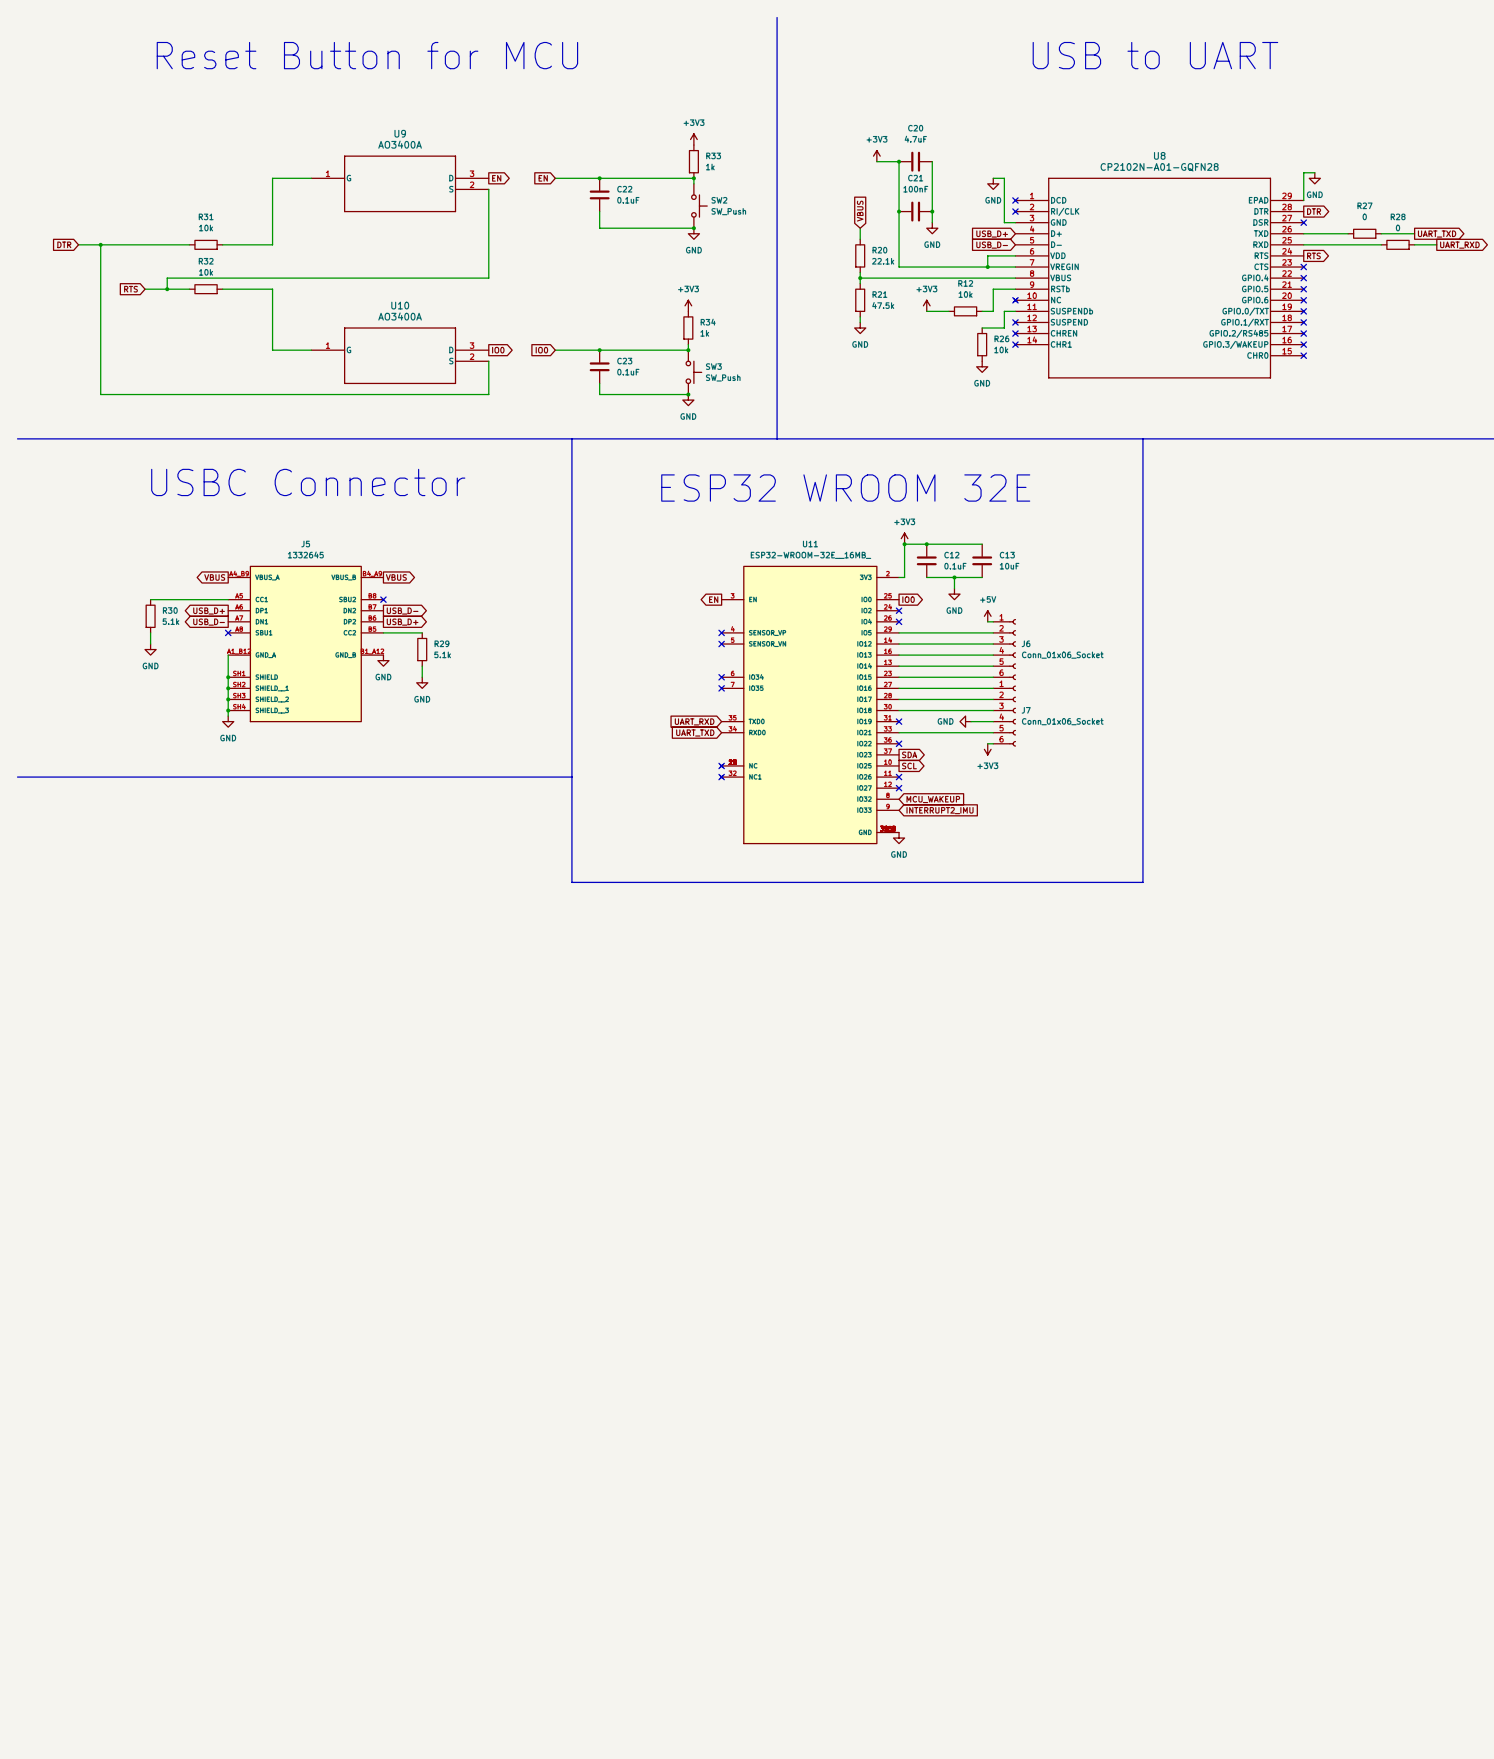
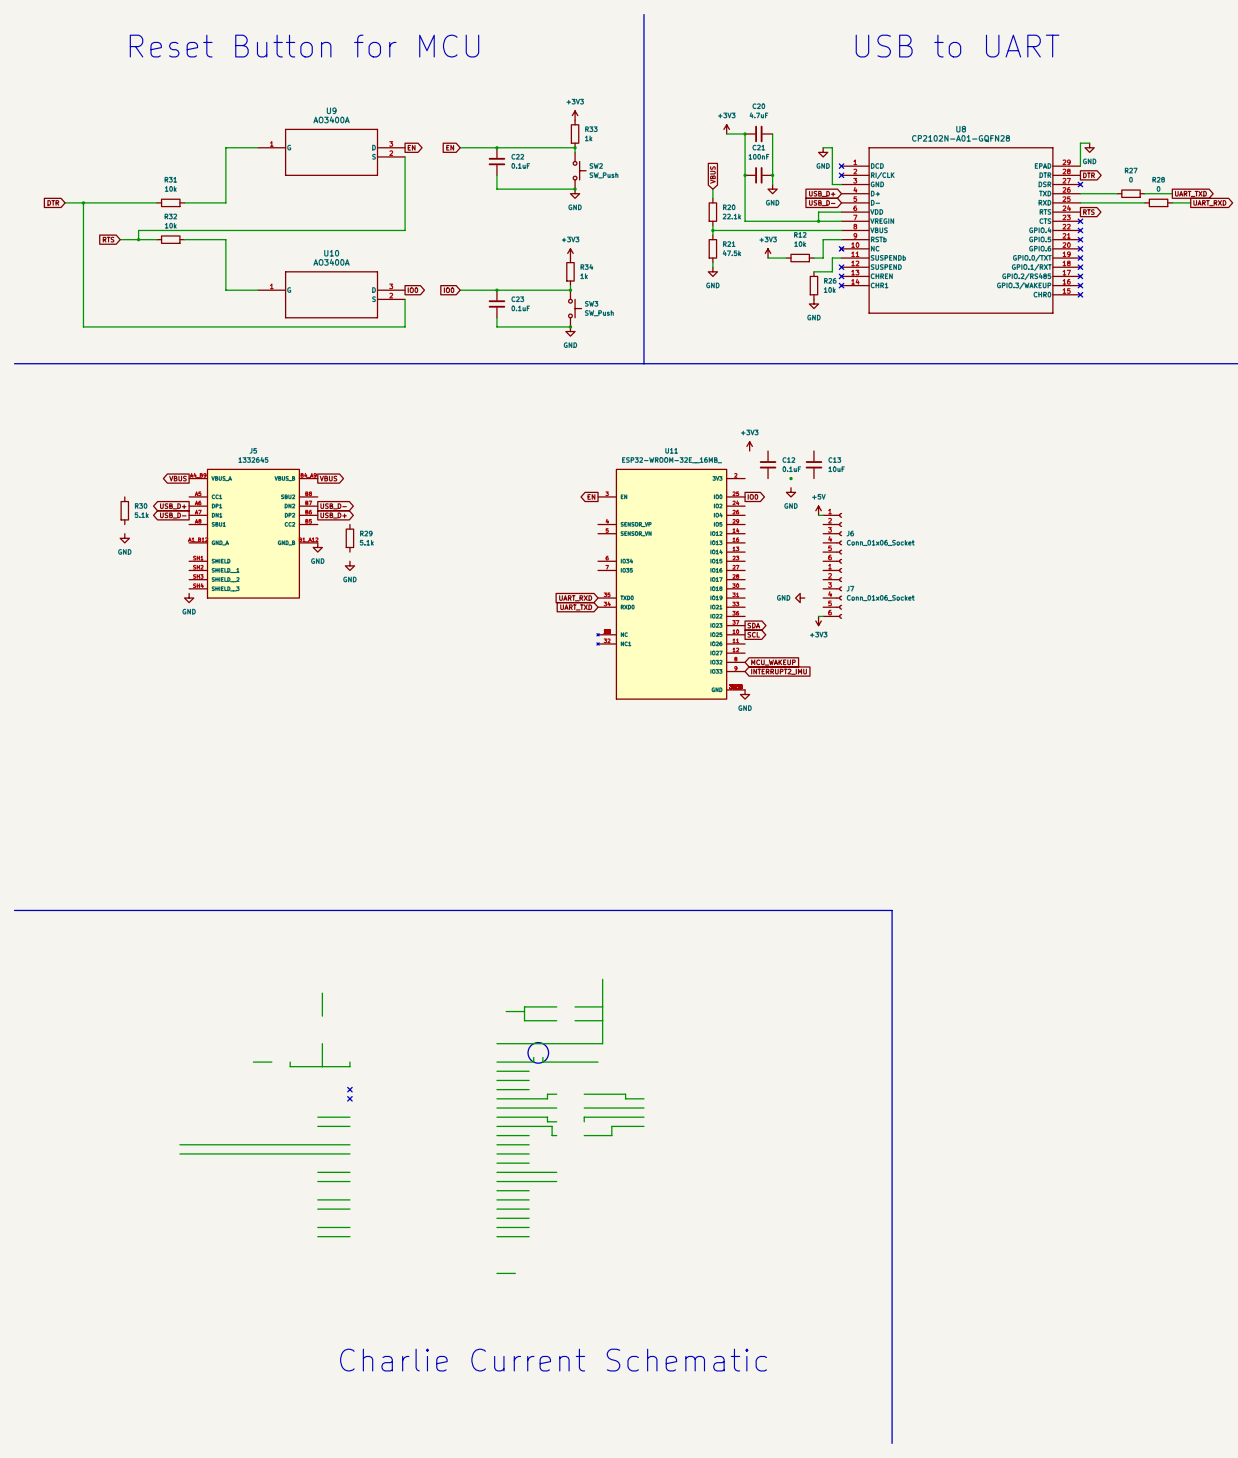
line: (571, 438) (571, 882) (1142, 882) (1142, 438) -> none
text: USBC Connector (308, 482) -> none
text: ESP32 WROOM 32E (845, 488) -> none
junction: (904, 544) -> none
junction: (926, 544) -> none
wire: (982, 544) (904, 544) (904, 577) (899, 577) -> none
wire: (926, 577) (982, 577) -> none
wire: (954, 577) (954, 588) -> none
wire: (150, 599) (228, 599) -> none
no-connect mark: (383, 599) -> none
no-connect mark: (899, 610) -> none
no-connect mark: (899, 621) -> none
wire: (150, 632) (150, 644) -> none
no-connect mark: (228, 632) -> none
wire: (383, 632) (422, 632) -> none
no-connect mark: (721, 632) -> none
wire: (899, 632) (993, 632) -> none
no-connect mark: (721, 644) -> none
wire: (899, 644) (993, 644) -> none
wire: (228, 655) (228, 716) -> none
wire: (899, 655) (993, 655) -> none
wire: (422, 666) (422, 677) -> none
wire: (899, 666) (993, 666) -> none
junction: (228, 677) -> none
no-connect mark: (721, 677) -> none
wire: (899, 677) (993, 677) -> none
junction: (228, 688) -> none
no-connect mark: (721, 688) -> none
wire: (899, 688) (993, 688) -> none
junction: (228, 699) -> none
wire: (899, 699) (993, 699) -> none
junction: (228, 710) -> none
wire: (899, 710) (993, 710) -> none
no-connect mark: (899, 721) -> none
wire: (971, 721) (993, 721) -> none
wire: (899, 732) (993, 732) -> none
no-connect mark: (899, 743) -> none
no-connect mark: (721, 765) -> none
line: (17, 777) (571, 777) -> none
no-connect mark: (721, 777) -> none
no-connect mark: (899, 777) -> none
no-connect mark: (899, 788) -> none
line: none -> (14, 910) (892, 910) (892, 1443)
wire: none -> (602, 979) (602, 1043) (496, 1043)
wire: none -> (322, 993) (322, 1016)
wire: none -> (556, 1006) (524, 1006) (524, 1020) (556, 1020)
wire: none -> (575, 1006) (602, 1006)
wire: none -> (506, 1011) (524, 1011)
wire: none -> (575, 1020) (602, 1020)
drawing: none -> [528, 1042, 549, 1064]
wire: none -> (322, 1043) (322, 1066)
wire: none -> (533, 1057) (533, 1062) (496, 1062)
wire: none -> (542, 1057) (542, 1062) (598, 1062)
wire: none -> (253, 1062) (271, 1062)
wire: none -> (290, 1062) (290, 1066) (349, 1066) (349, 1062)
wire: none -> (496, 1071) (529, 1071)
wire: none -> (496, 1080) (529, 1080)
no-connect mark: none -> (349, 1089)
wire: none -> (496, 1089) (529, 1089)
wire: none -> (556, 1094) (547, 1094) (547, 1098) (496, 1098)
wire: none -> (584, 1094) (625, 1094) (625, 1098) (643, 1098)
no-connect mark: none -> (349, 1098)
wire: none -> (496, 1108) (556, 1108)
wire: none -> (584, 1108) (643, 1108)
wire: none -> (317, 1117) (349, 1117)
wire: none -> (496, 1117) (547, 1117) (547, 1121) (556, 1121)
wire: none -> (643, 1117) (584, 1117) (584, 1121)
wire: none -> (317, 1126) (349, 1126)
wire: none -> (496, 1126) (552, 1126) (552, 1135) (556, 1135)
wire: none -> (643, 1126) (611, 1126) (611, 1135) (584, 1135)
wire: none -> (496, 1135) (529, 1135)
wire: none -> (179, 1144) (349, 1144)
wire: none -> (496, 1144) (529, 1144)
wire: none -> (179, 1153) (349, 1153)
wire: none -> (496, 1153) (529, 1153)
wire: none -> (496, 1163) (529, 1163)
wire: none -> (317, 1172) (349, 1172)
wire: none -> (496, 1172) (556, 1172)
wire: none -> (317, 1181) (349, 1181)
wire: none -> (496, 1181) (556, 1181)
wire: none -> (496, 1190) (529, 1190)
wire: none -> (317, 1199) (349, 1199)
wire: none -> (496, 1199) (529, 1199)
wire: none -> (317, 1209) (349, 1209)
wire: none -> (496, 1209) (529, 1209)
wire: none -> (496, 1218) (529, 1218)
wire: none -> (317, 1227) (349, 1227)
wire: none -> (496, 1227) (529, 1227)
wire: none -> (317, 1236) (349, 1236)
wire: none -> (496, 1236) (529, 1236)
wire: none -> (496, 1273) (515, 1273)
text: none -> Charlie Current Schematic (553, 1360)

